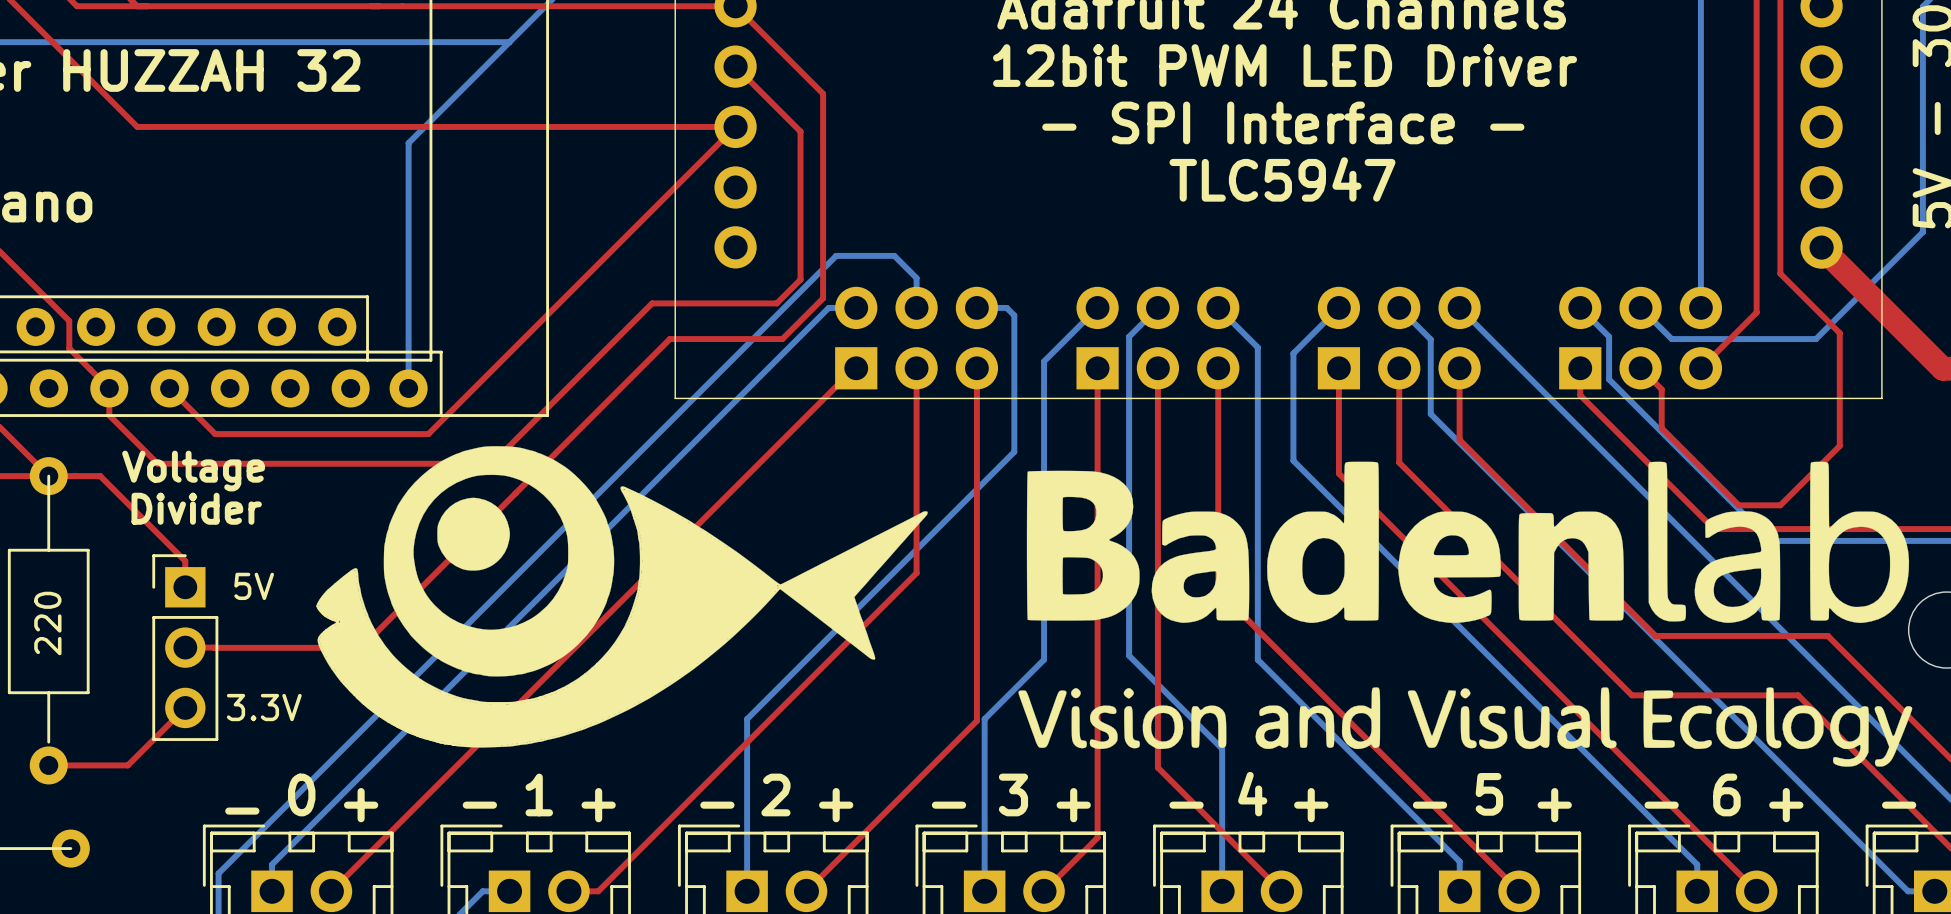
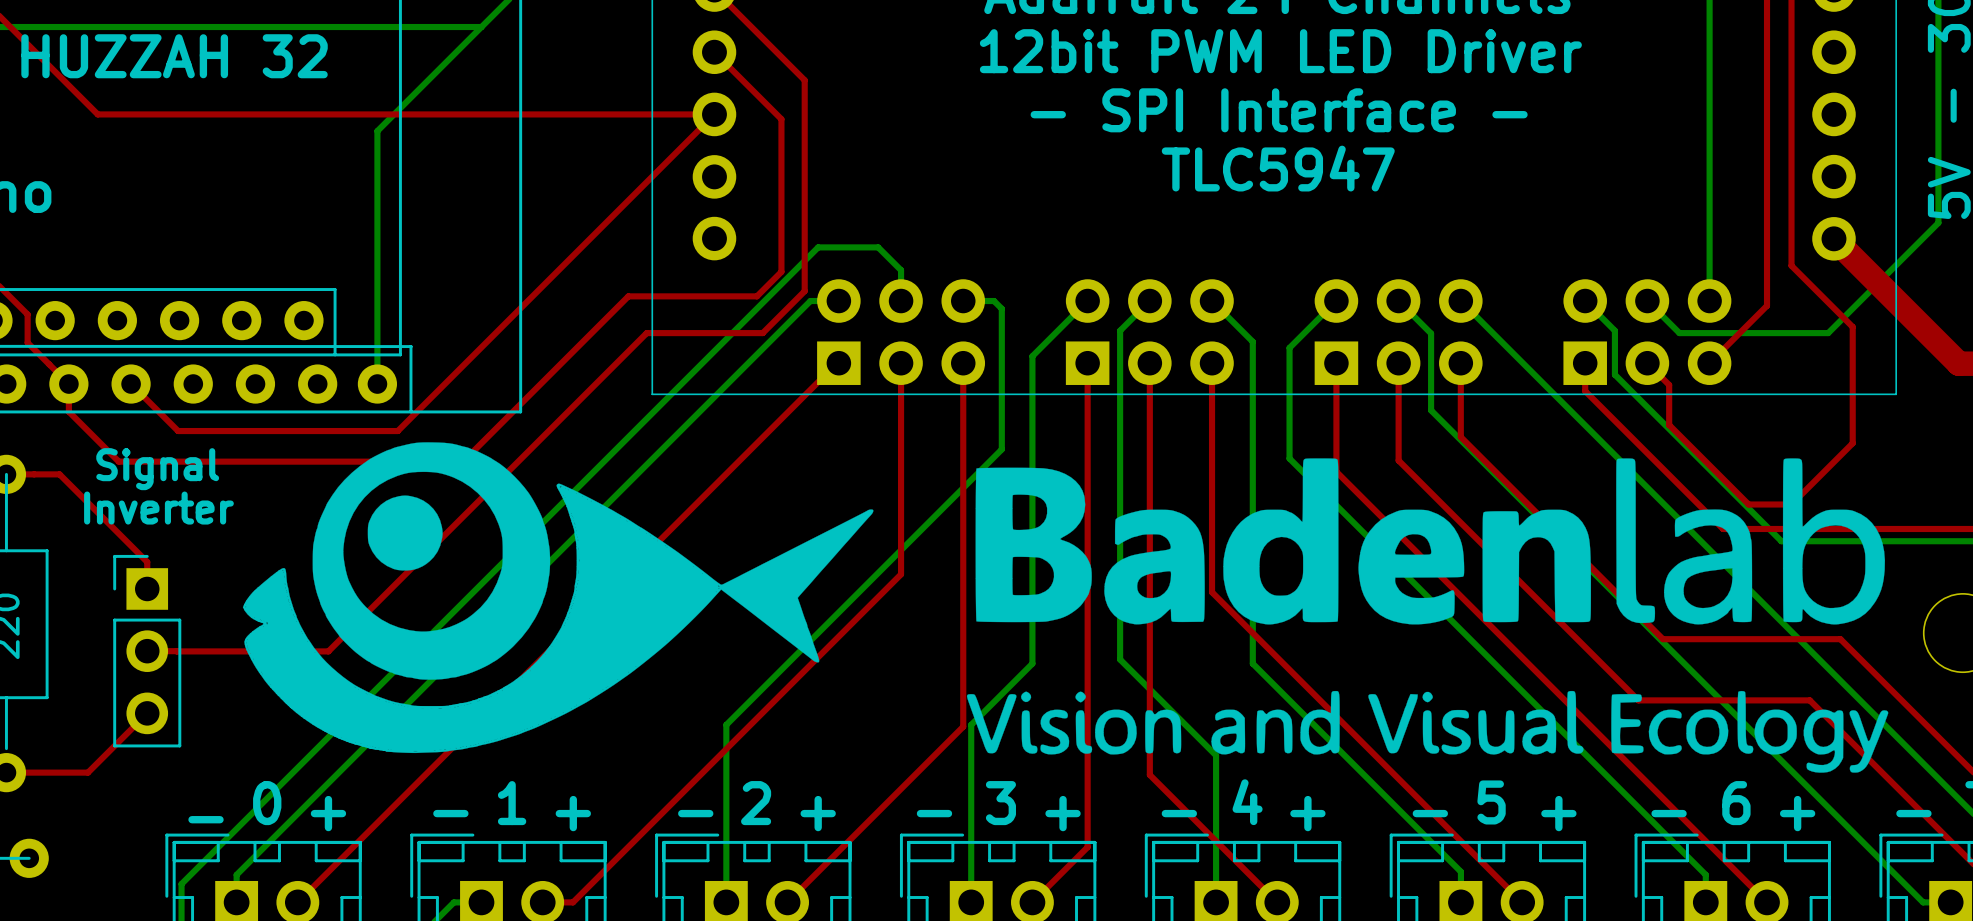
text: Voltage (193, 471) -> Signal (157, 469)
text: Divider (196, 508) -> Inverter (158, 508)
drawing: [234, 572, 275, 601] -> none
drawing position: (1114, 606) -> (1065, 607)
drawing: [226, 693, 302, 722] -> none

